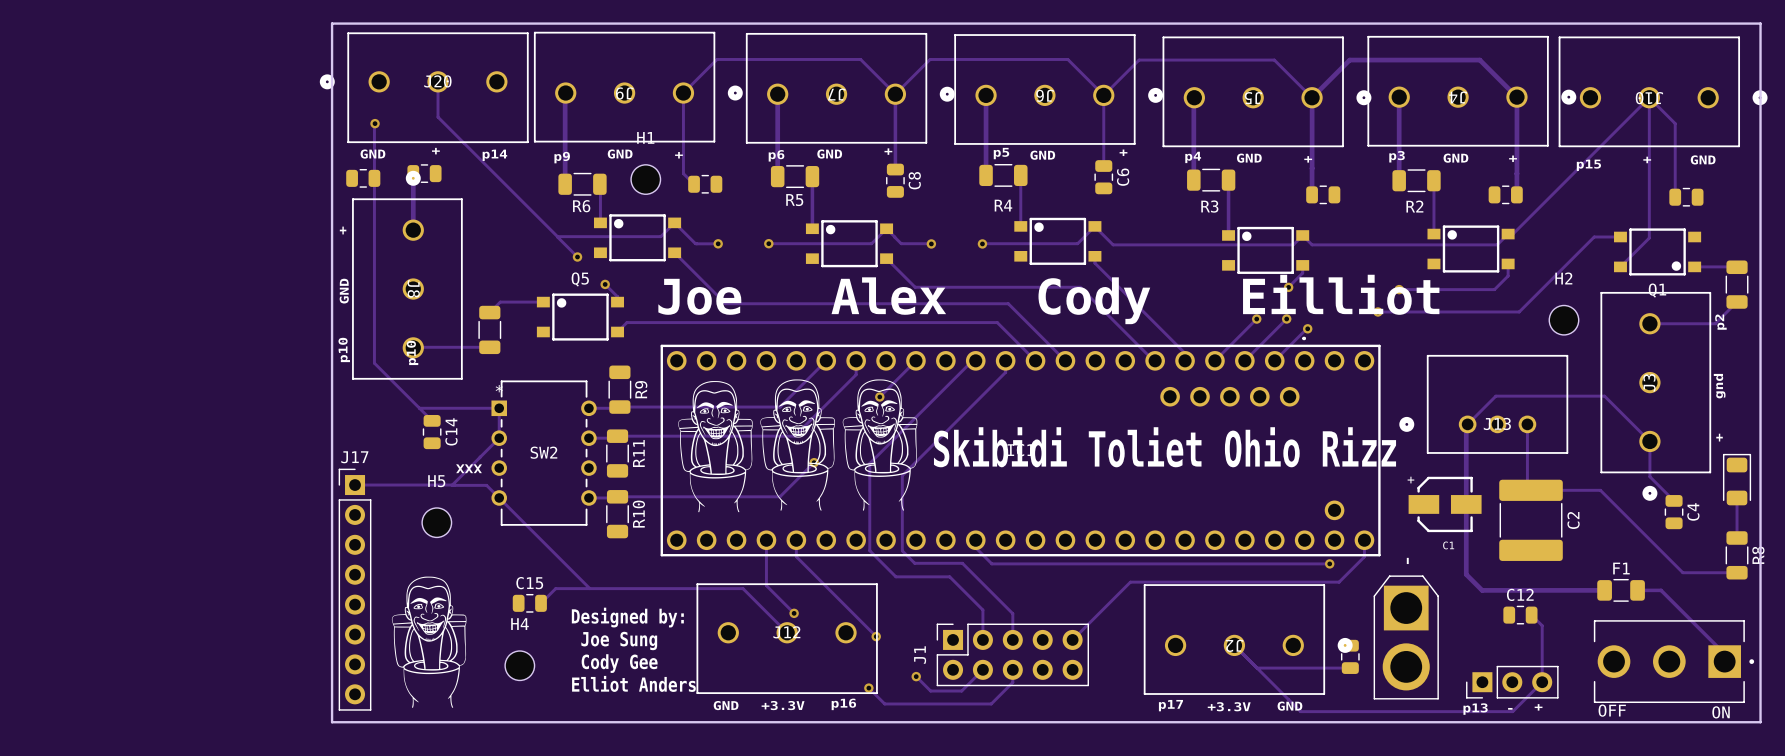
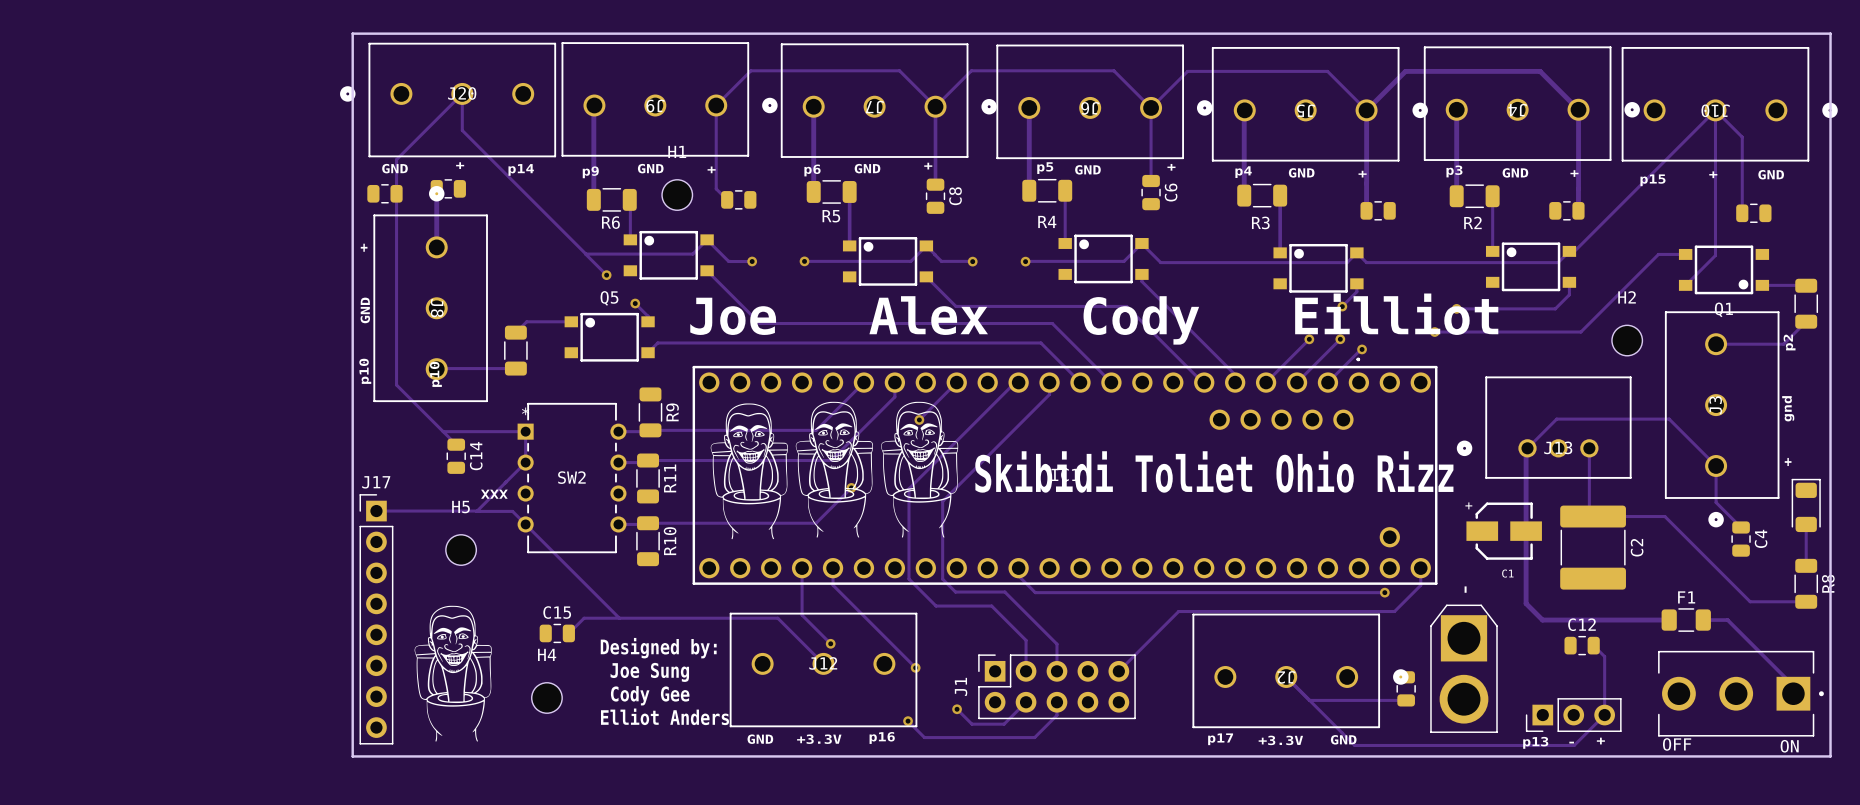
track: (375, 123) (374, 145) -> (462, 93) (396, 159)
via: (375, 123) -> none

